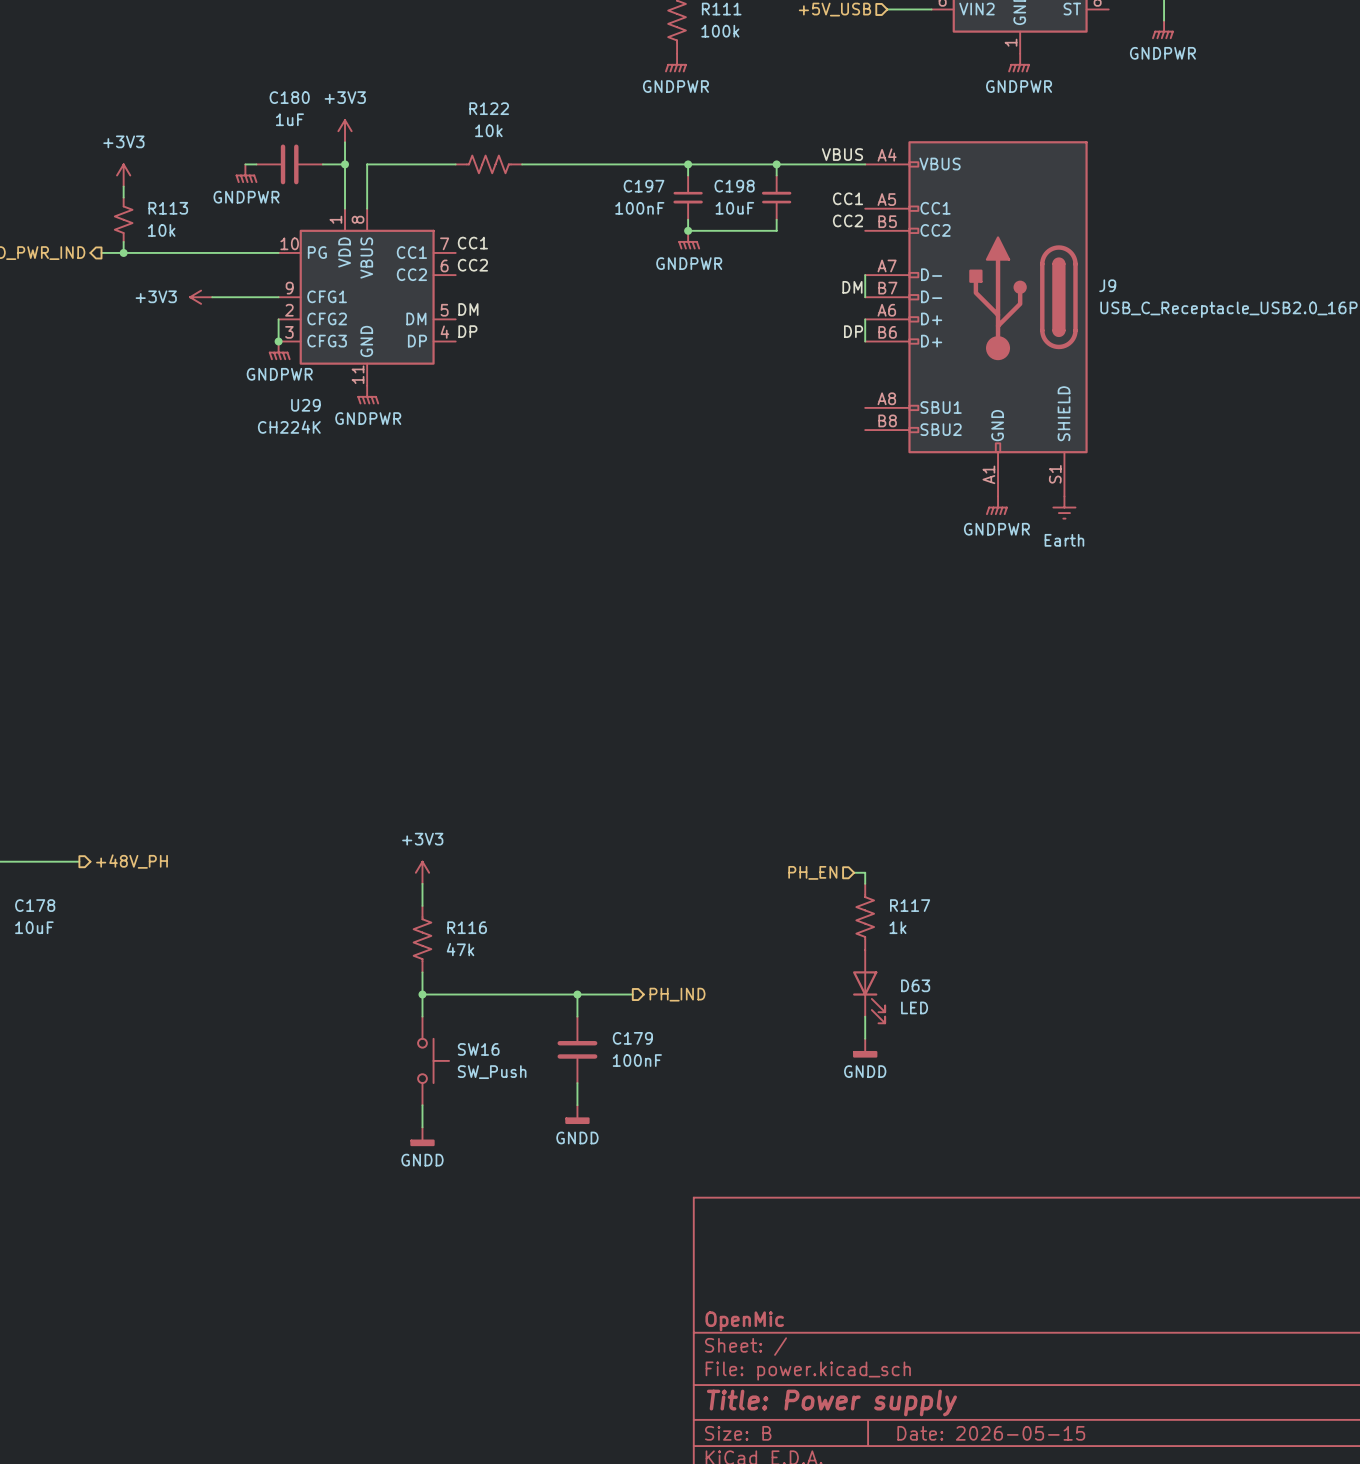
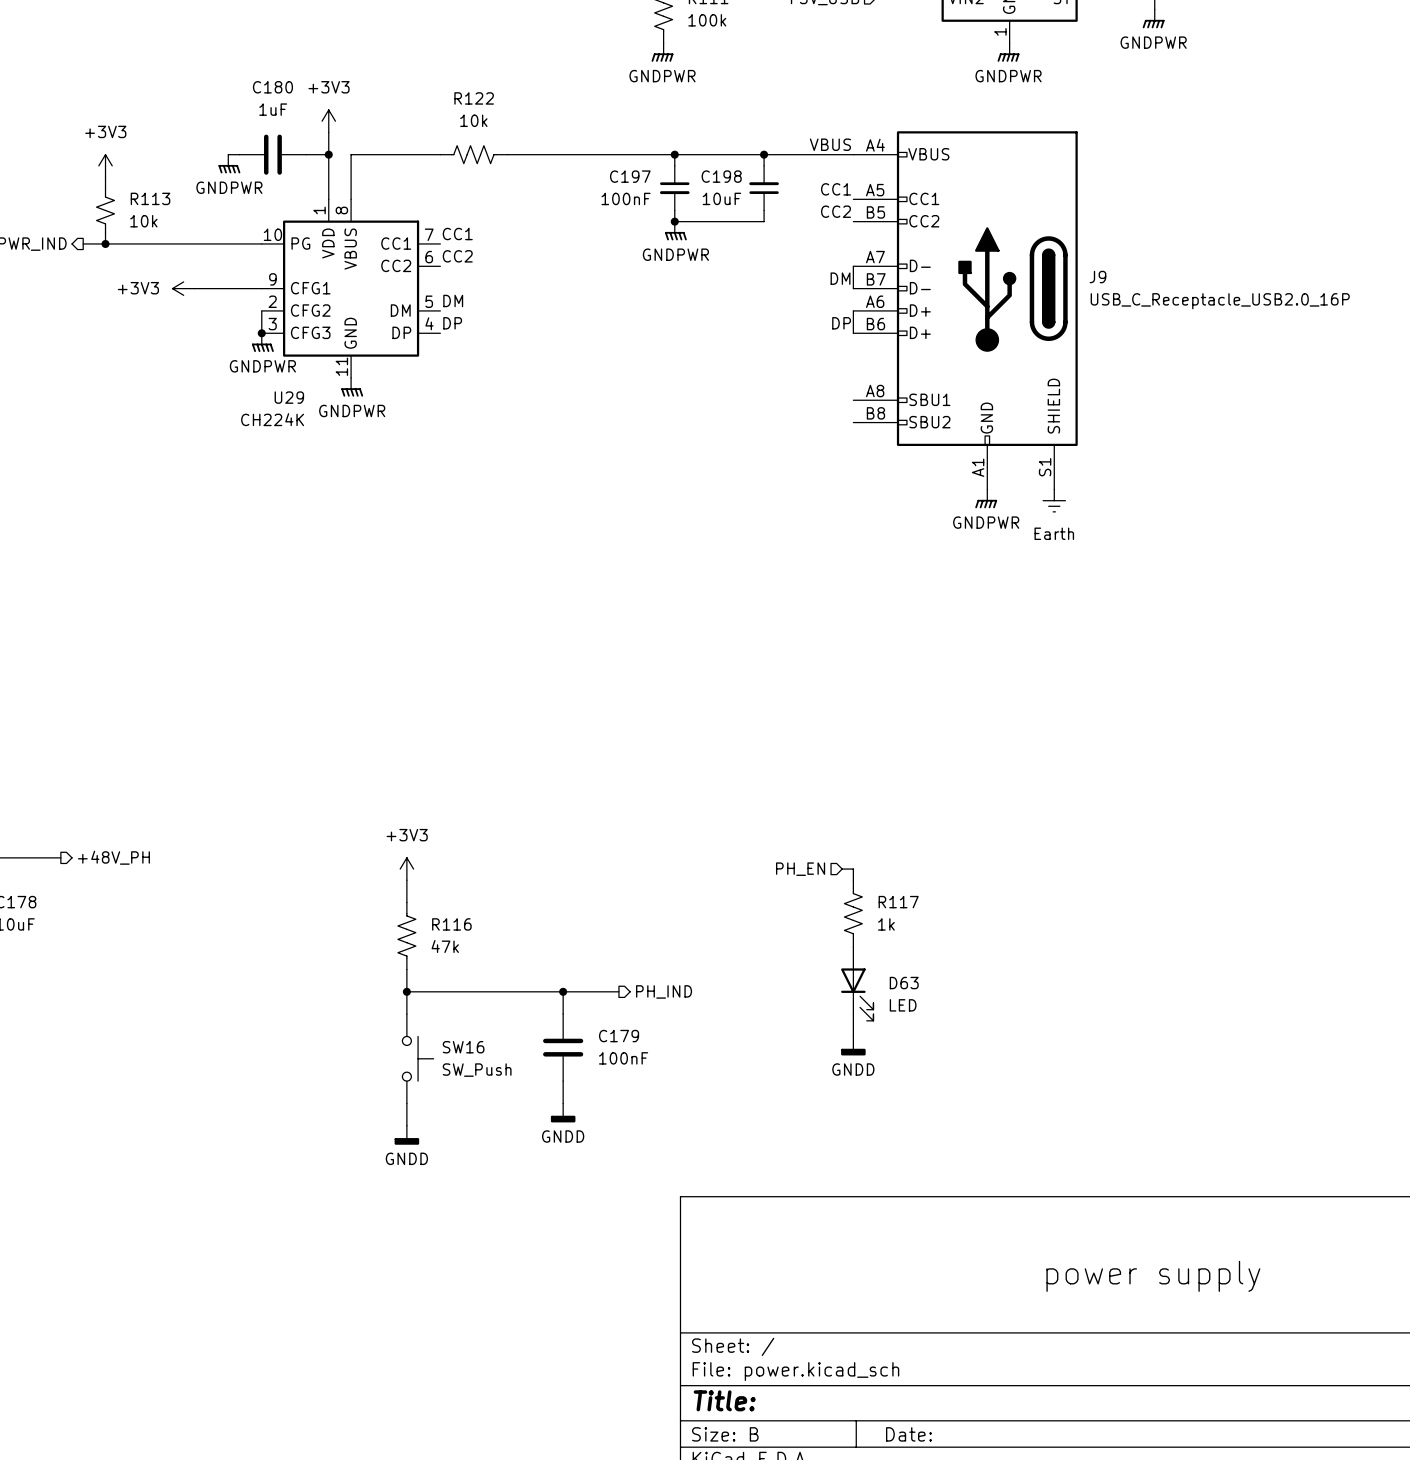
text: none -> power supply (1153, 1276)
title block: OpenMic (744, 1321) -> none
title block: Title: Power supply (831, 1402) -> Title: (724, 1400)
title block: Date: 2026-05-15 (991, 1433) -> Date: (908, 1434)

